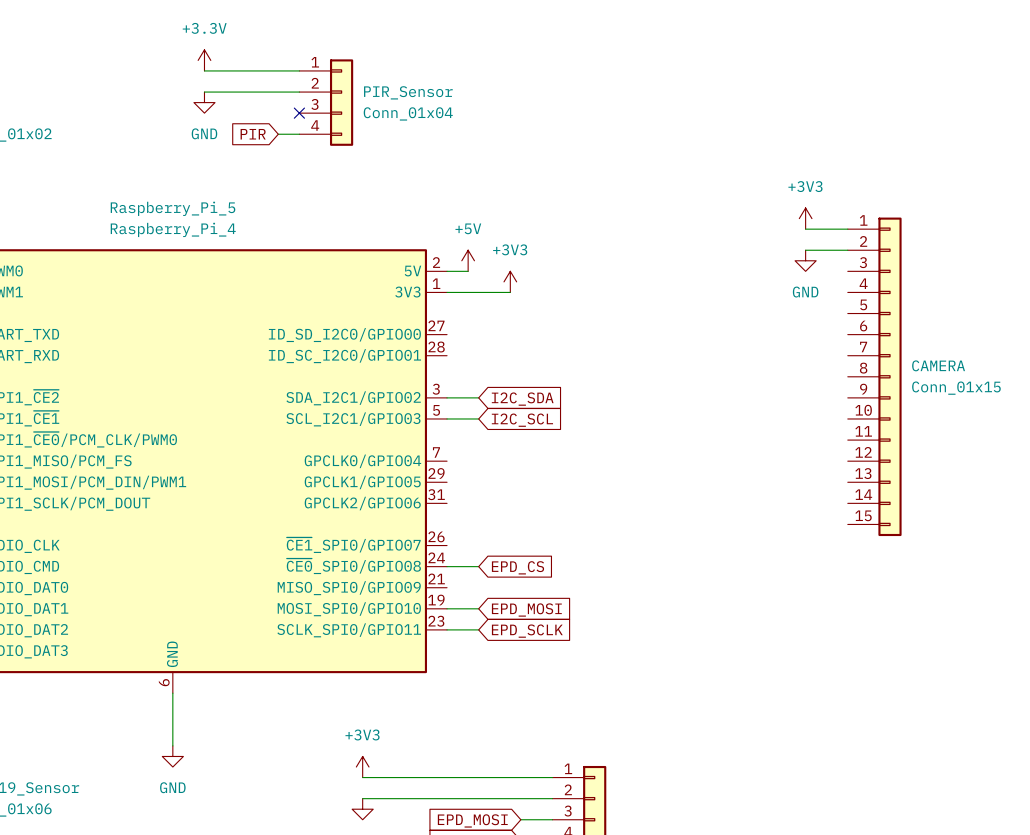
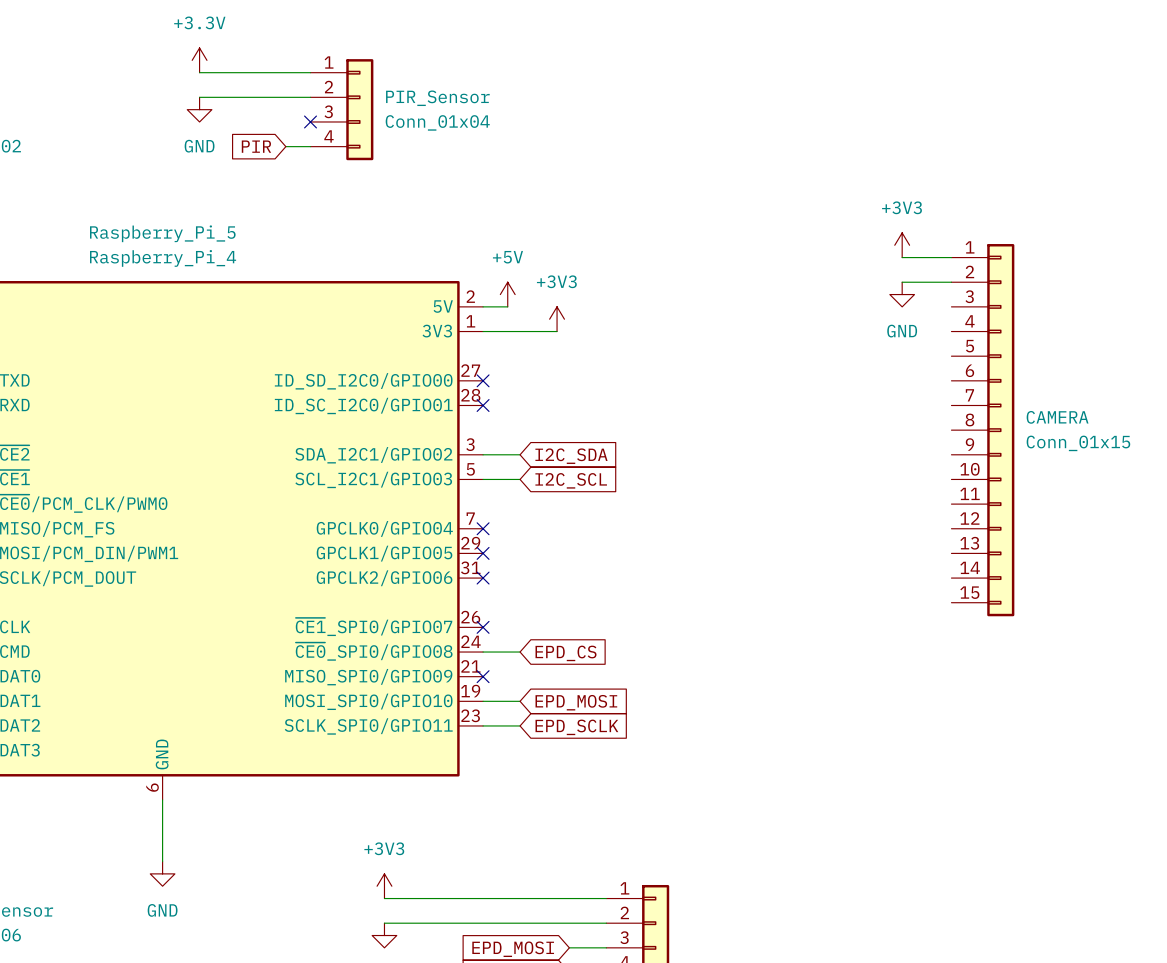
no-connect mark: none -> (483, 380)
no-connect mark: none -> (483, 405)
no-connect mark: none -> (483, 528)
no-connect mark: none -> (483, 553)
no-connect mark: none -> (483, 578)
no-connect mark: none -> (483, 627)
no-connect mark: none -> (483, 676)

